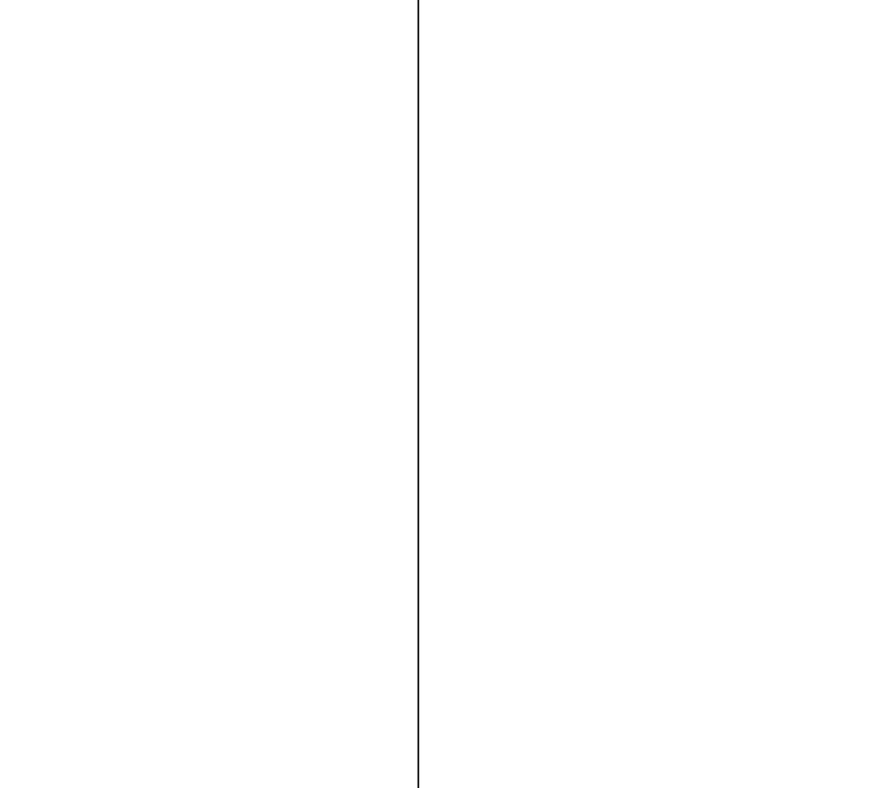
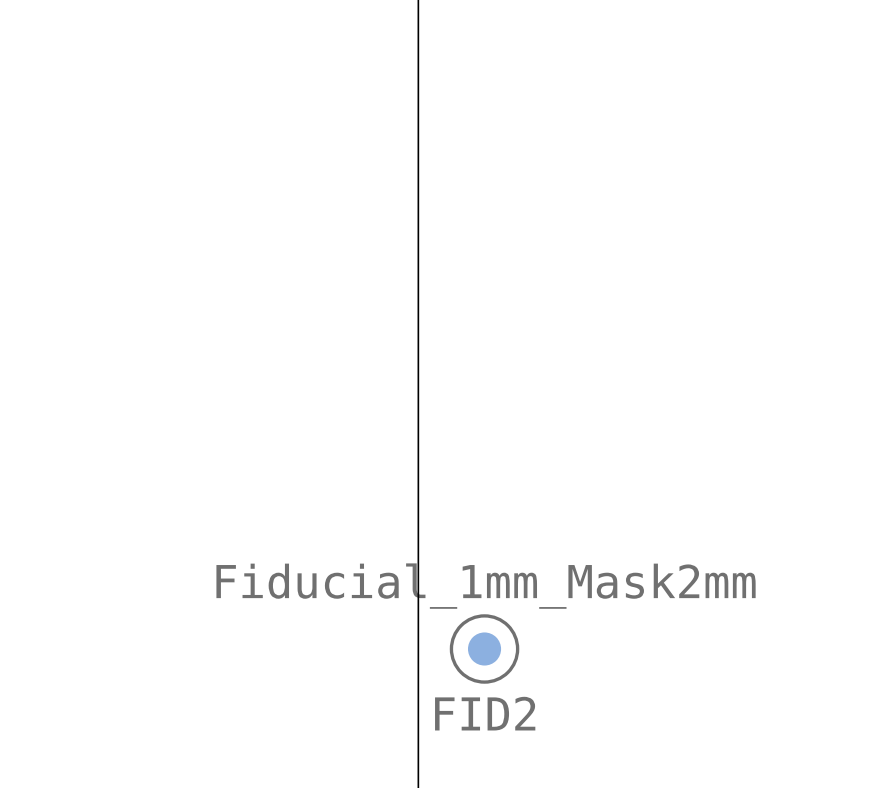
FID2: none -> Fiducial_1mm_Mask2mm (484, 648)

